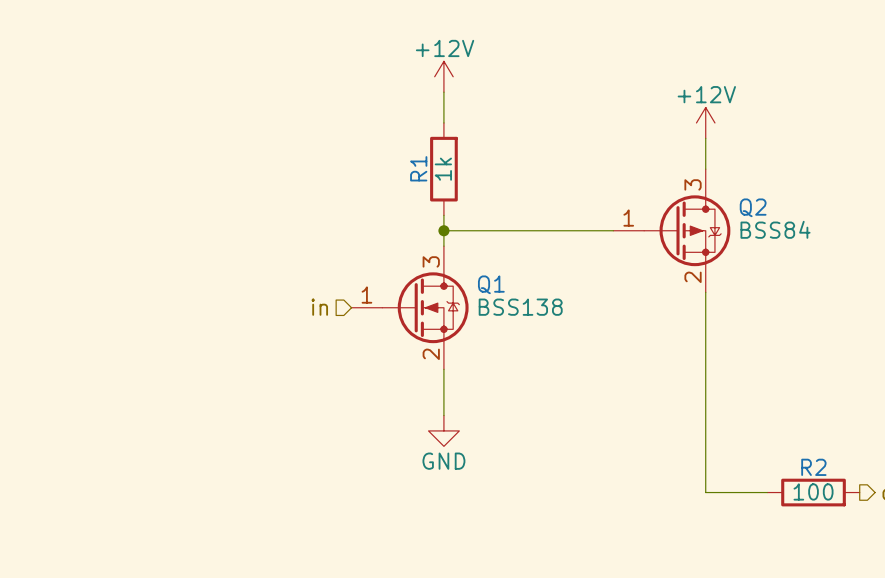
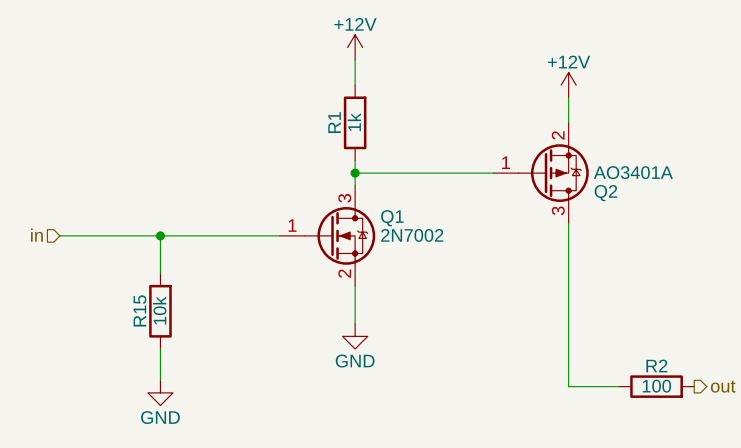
Q2 value: BSS84 (775, 229) -> AO3401A (633, 172)
Q2 flip: as is (687, 230) -> up-down (553, 173)
wire: none -> (59, 235) (279, 235)
wire: none -> (160, 235) (160, 273)
junction: none -> (160, 235)
hierarchical label position: in (319, 307) -> in (36, 235)
Q1 value: BSS138 (520, 307) -> 2N7002 (412, 235)
R15: none -> 10k (160, 311)
wire: none -> (160, 348) (160, 380)
power symbol: none -> GND (160, 392)

